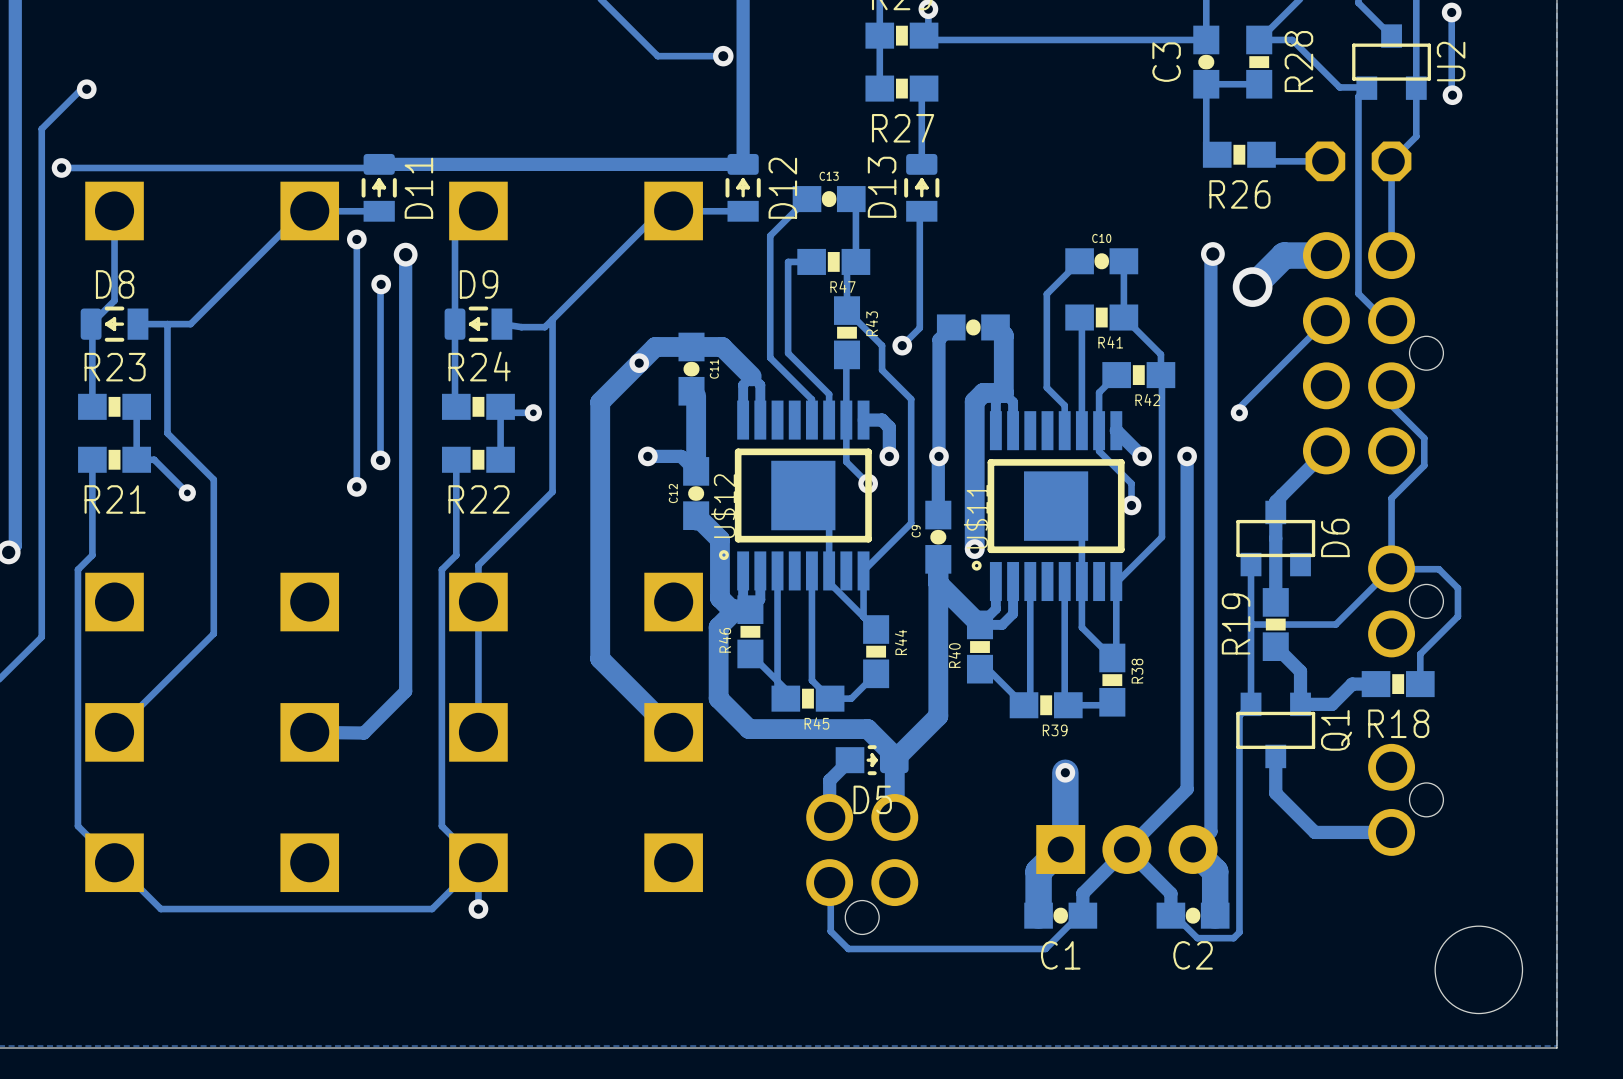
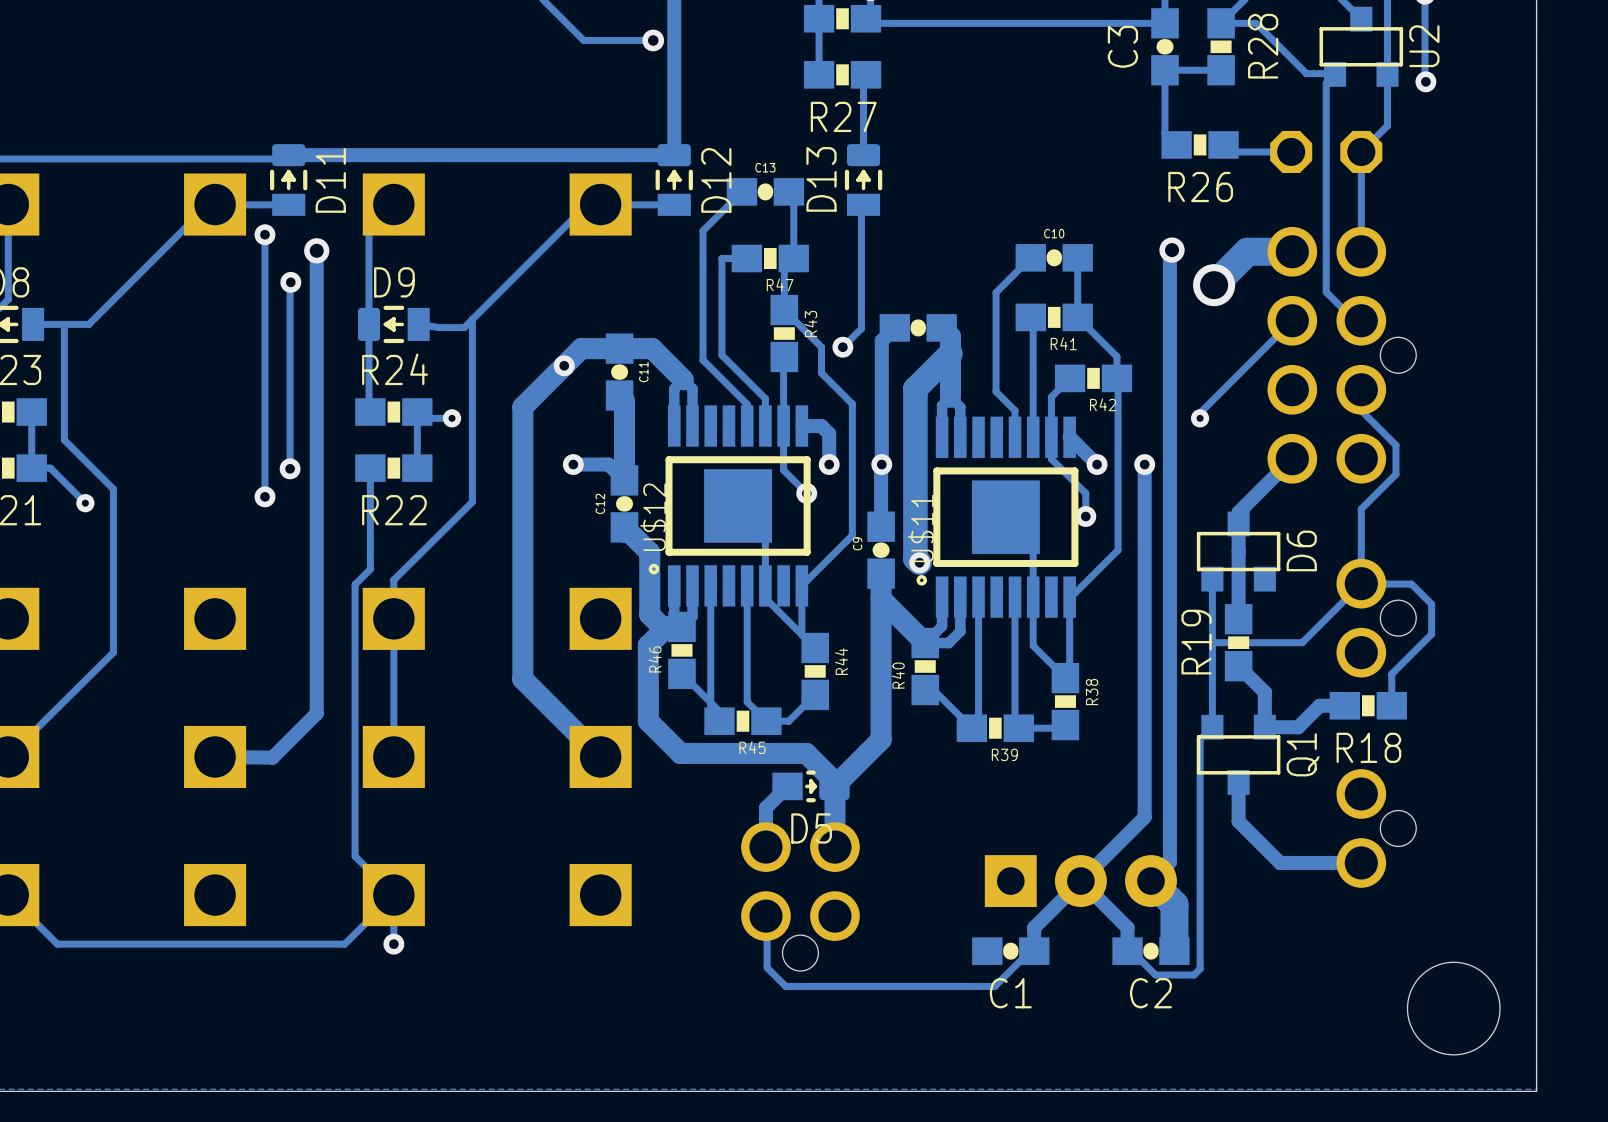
track: (1003, 392) (983, 392) (974, 401) (974, 549) -> (950, 353) (915, 388) (915, 558) (919, 562)
track: (1065, 772) (1065, 844) (1038, 871) (1038, 915) -> none
via: (1065, 772) -> none

